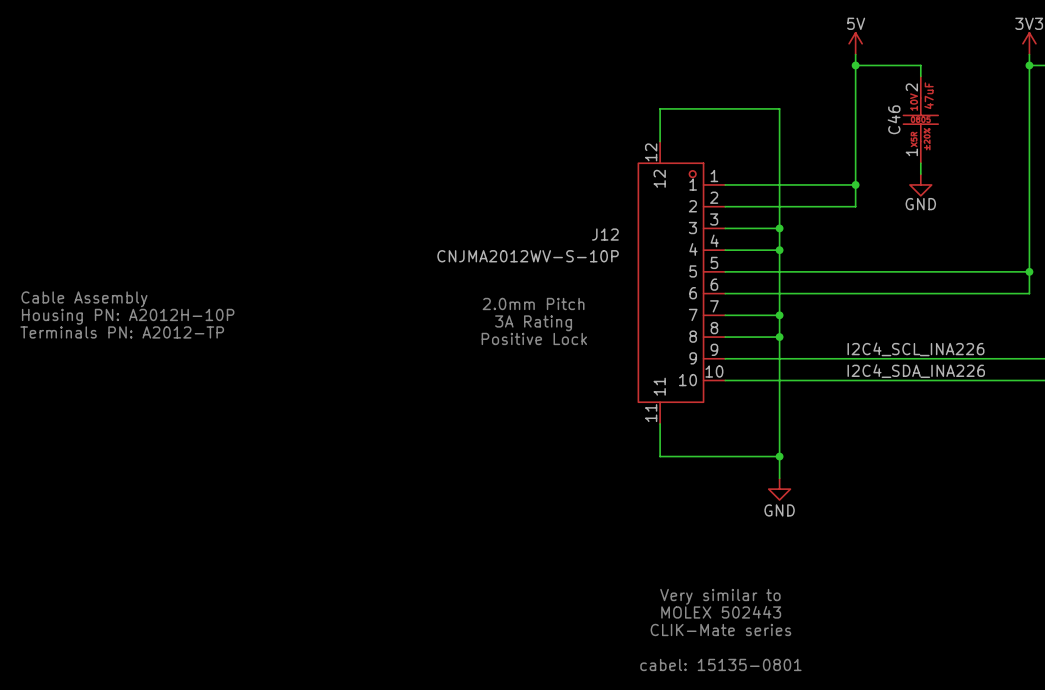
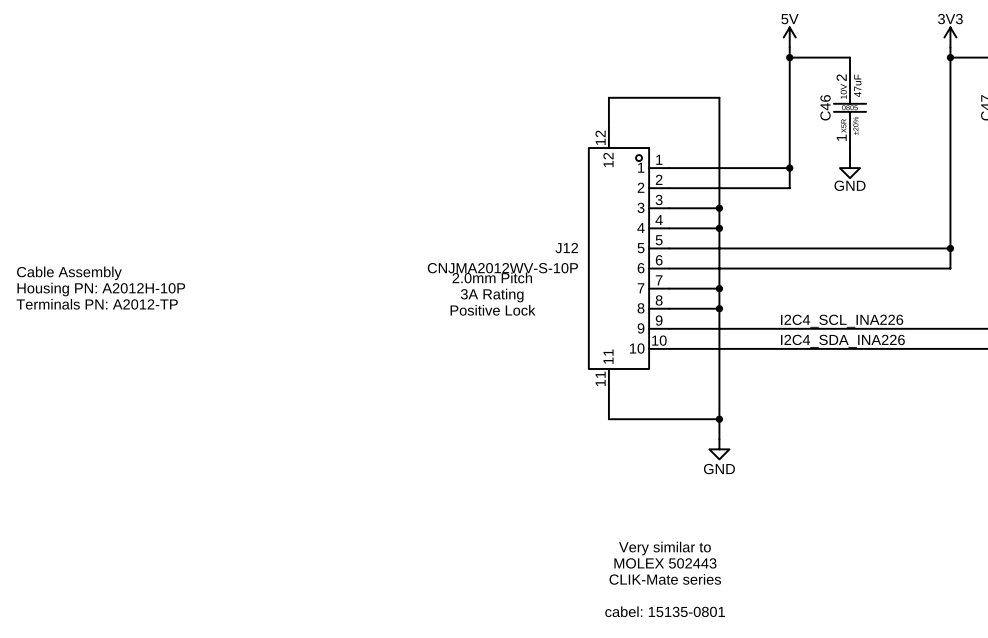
J12 name position: J12 (605, 234) -> J12 (566, 248)
J12 value position: CNJMA2012WV-S-10P (528, 256) -> CNJMA2012WV-S-10P (502, 268)

